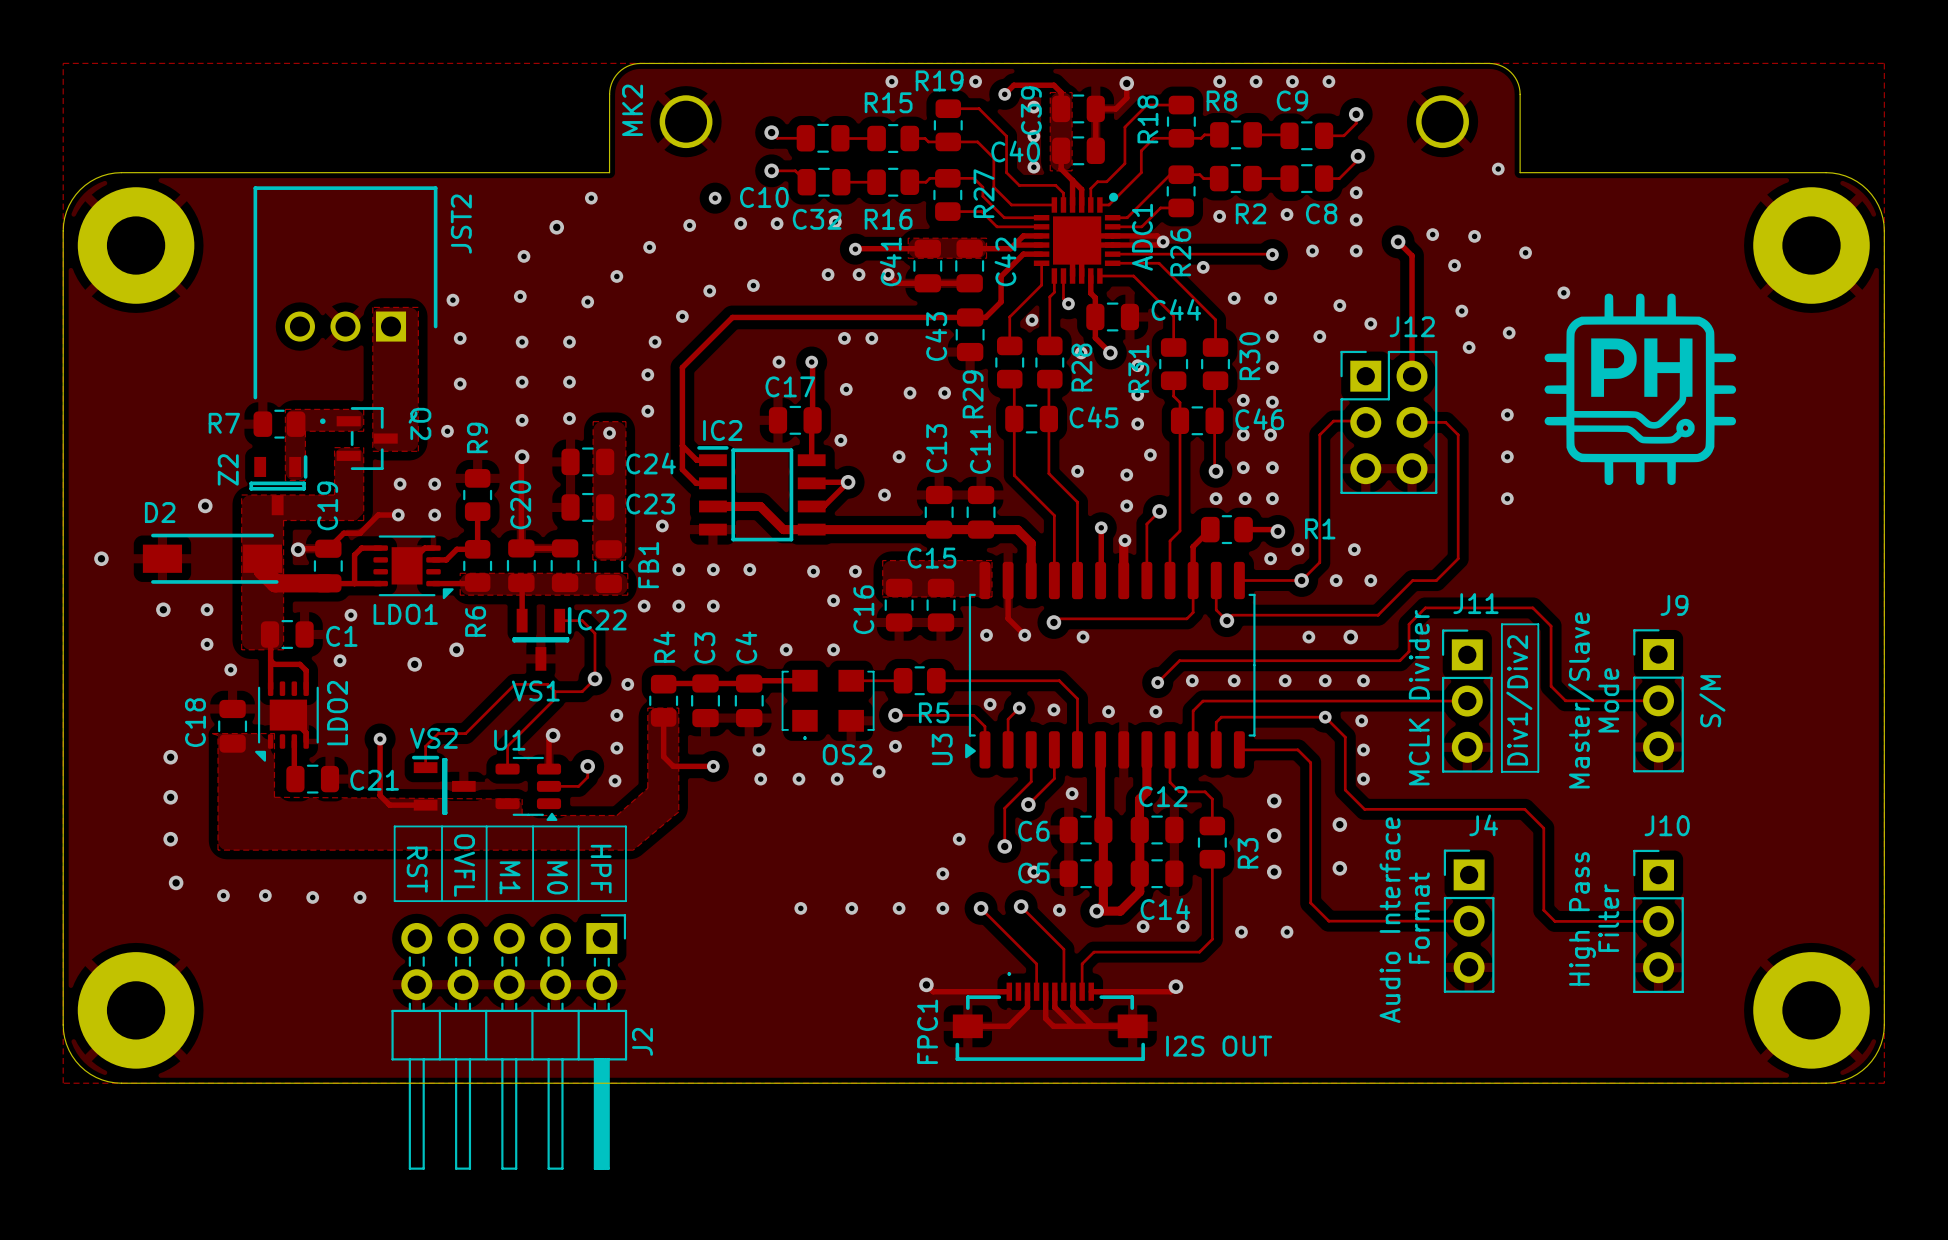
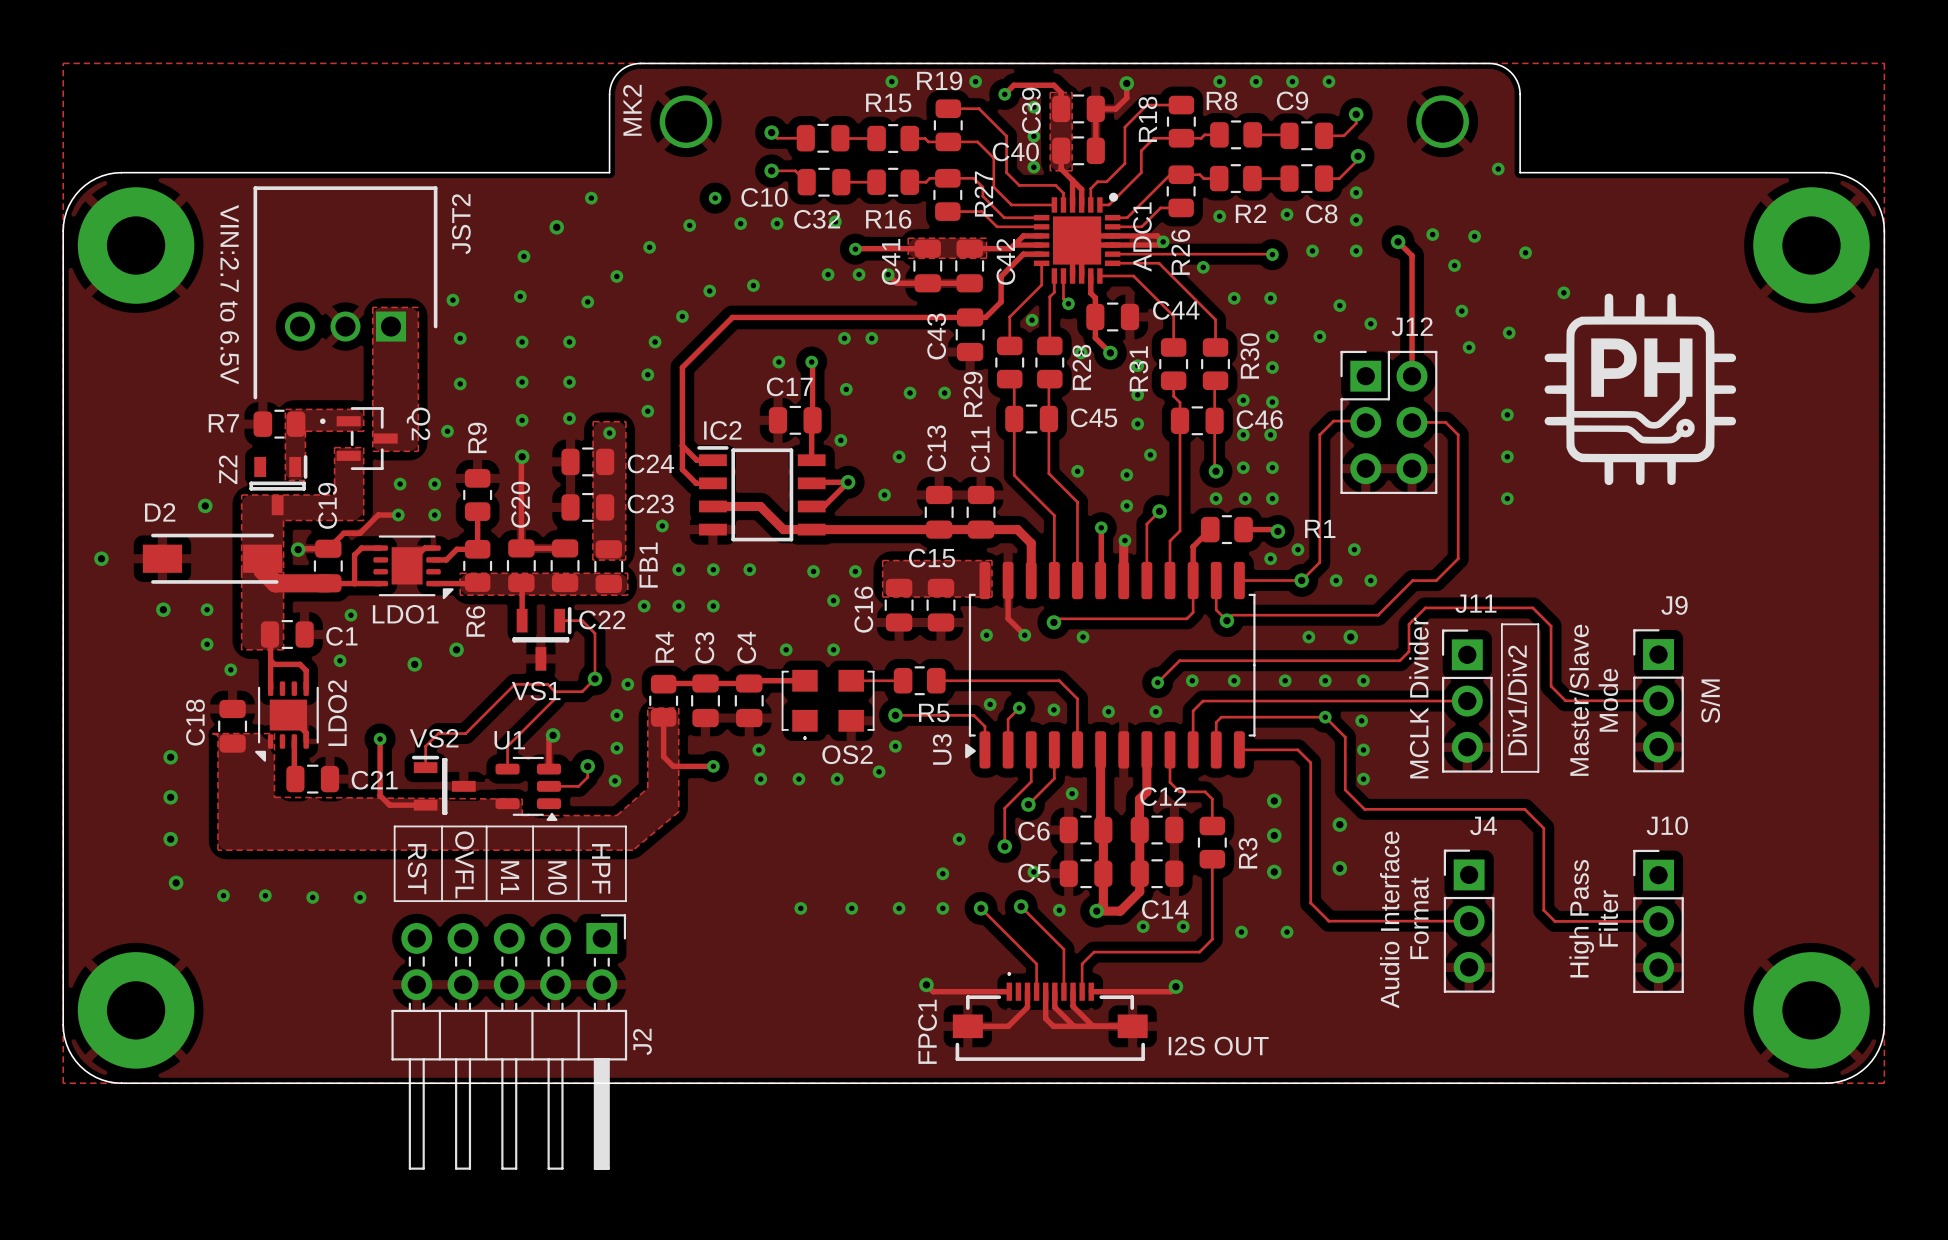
text: none -> VIN:2.7 to 6.5V (229, 294)

